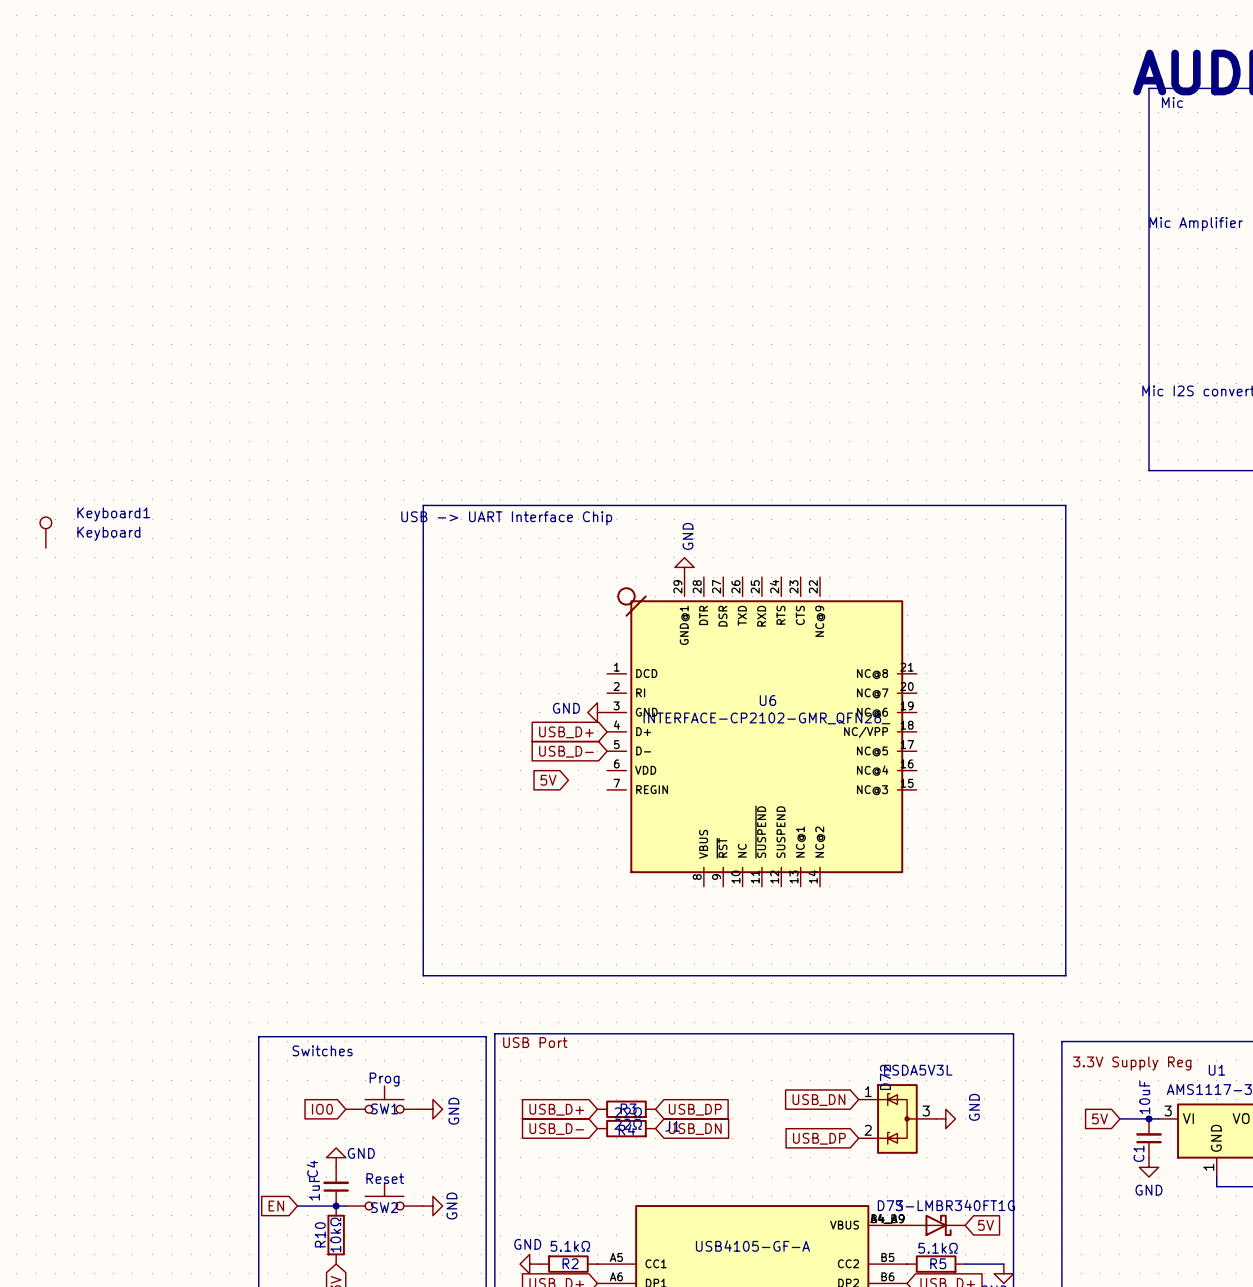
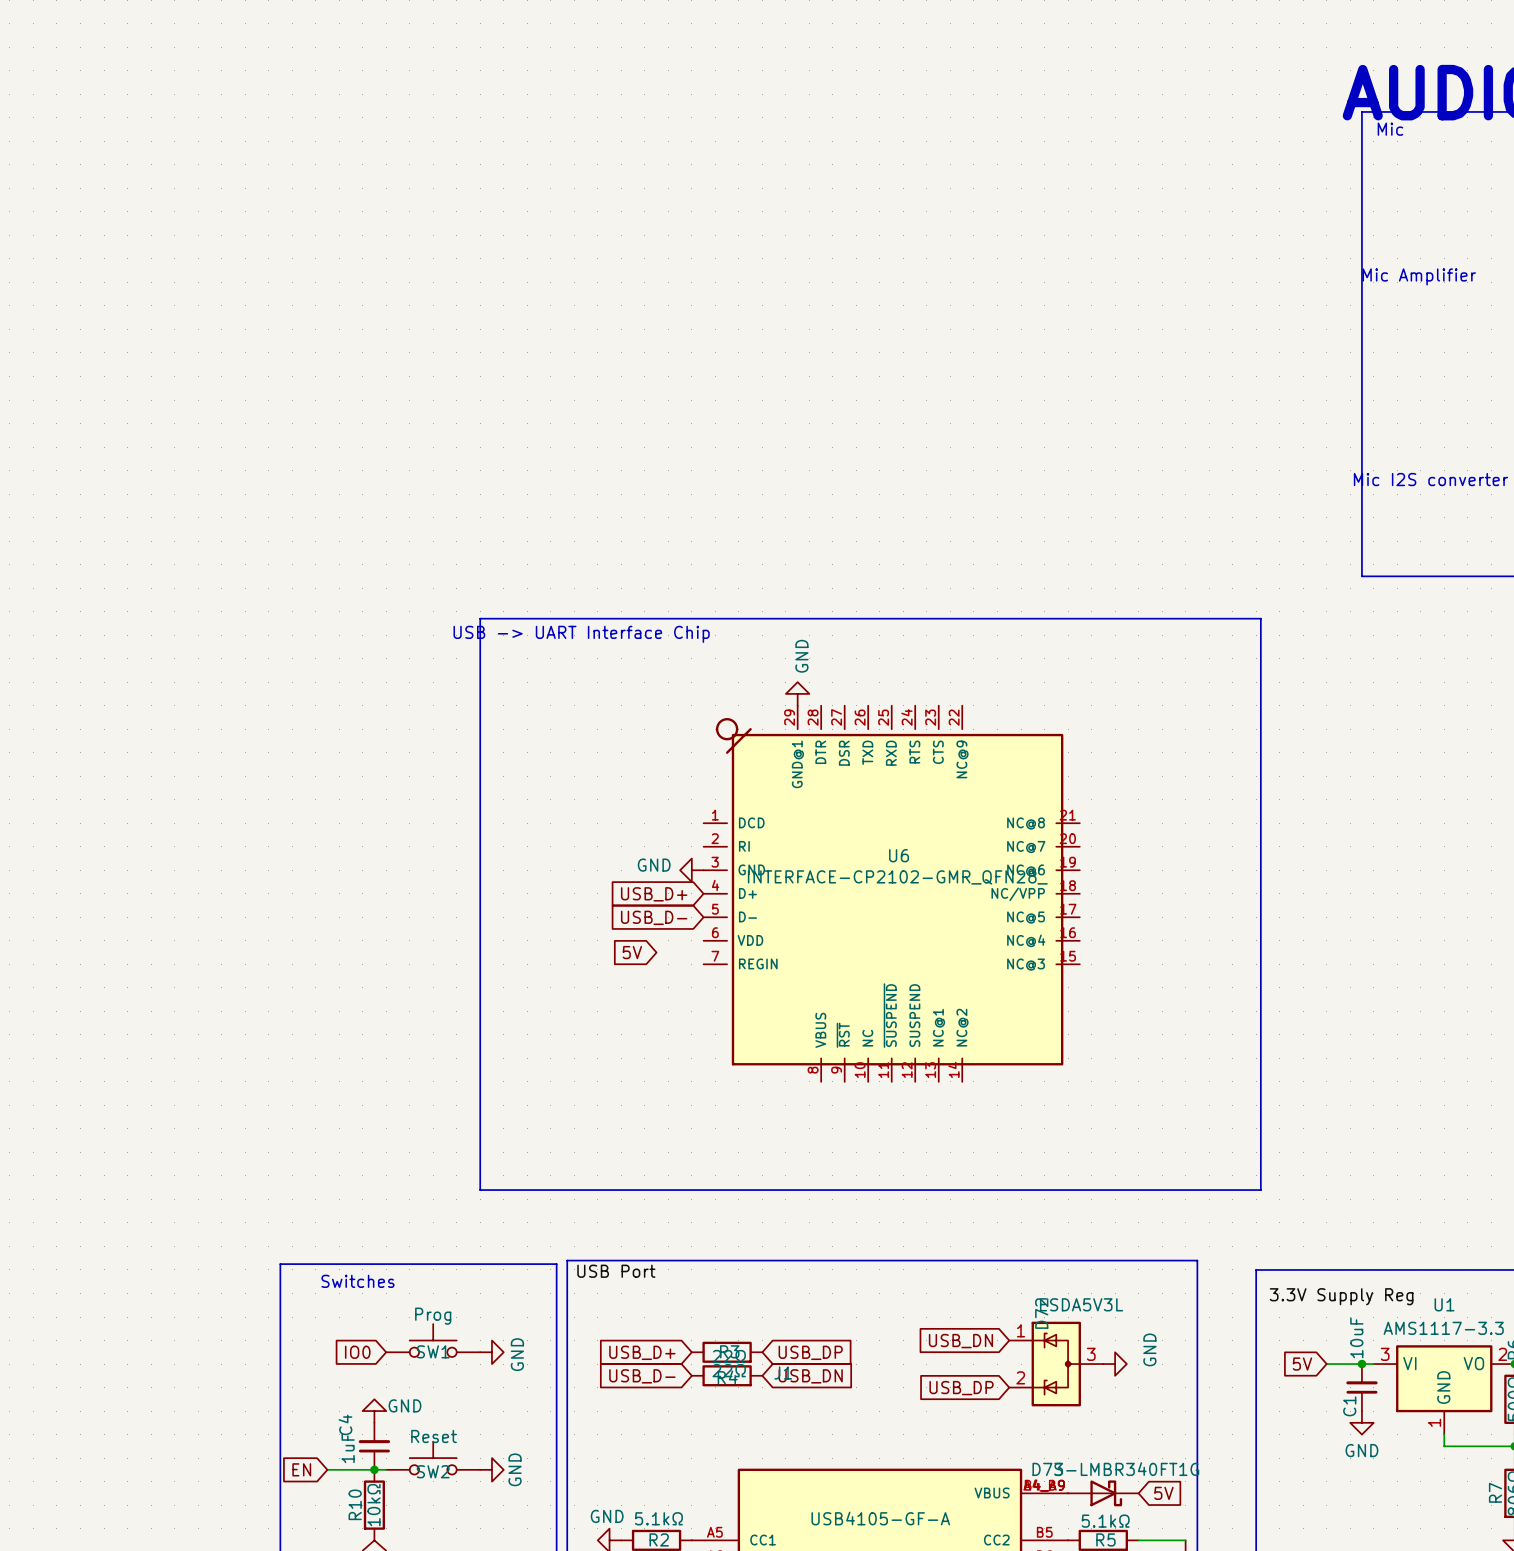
Keyboard1: Keyboard (45, 532) -> none

